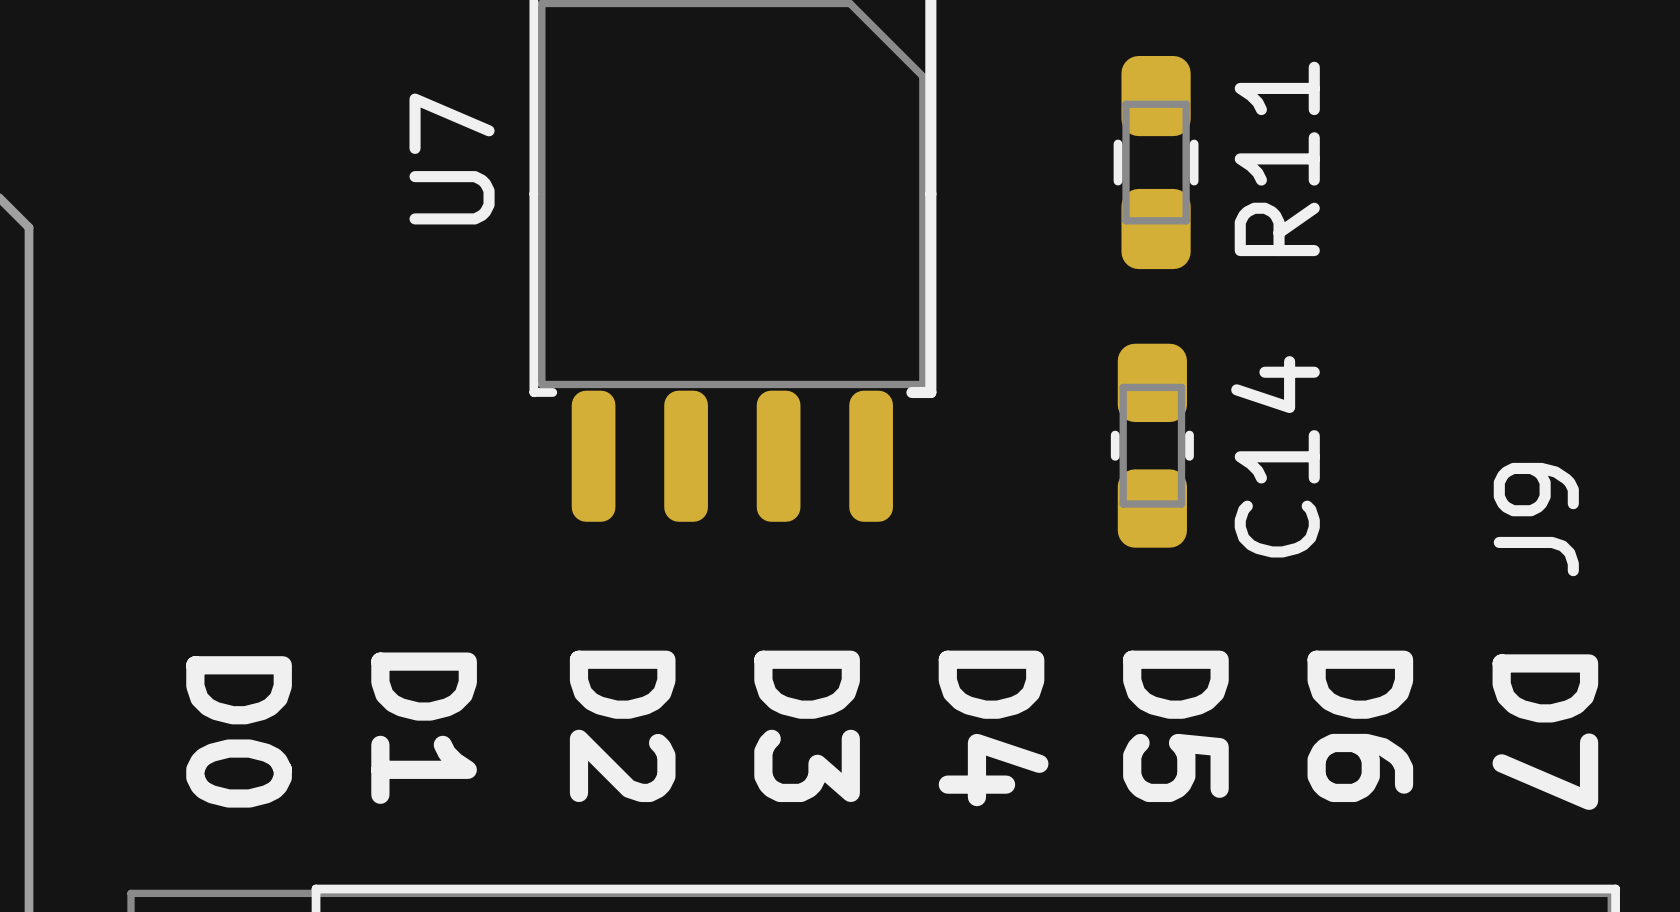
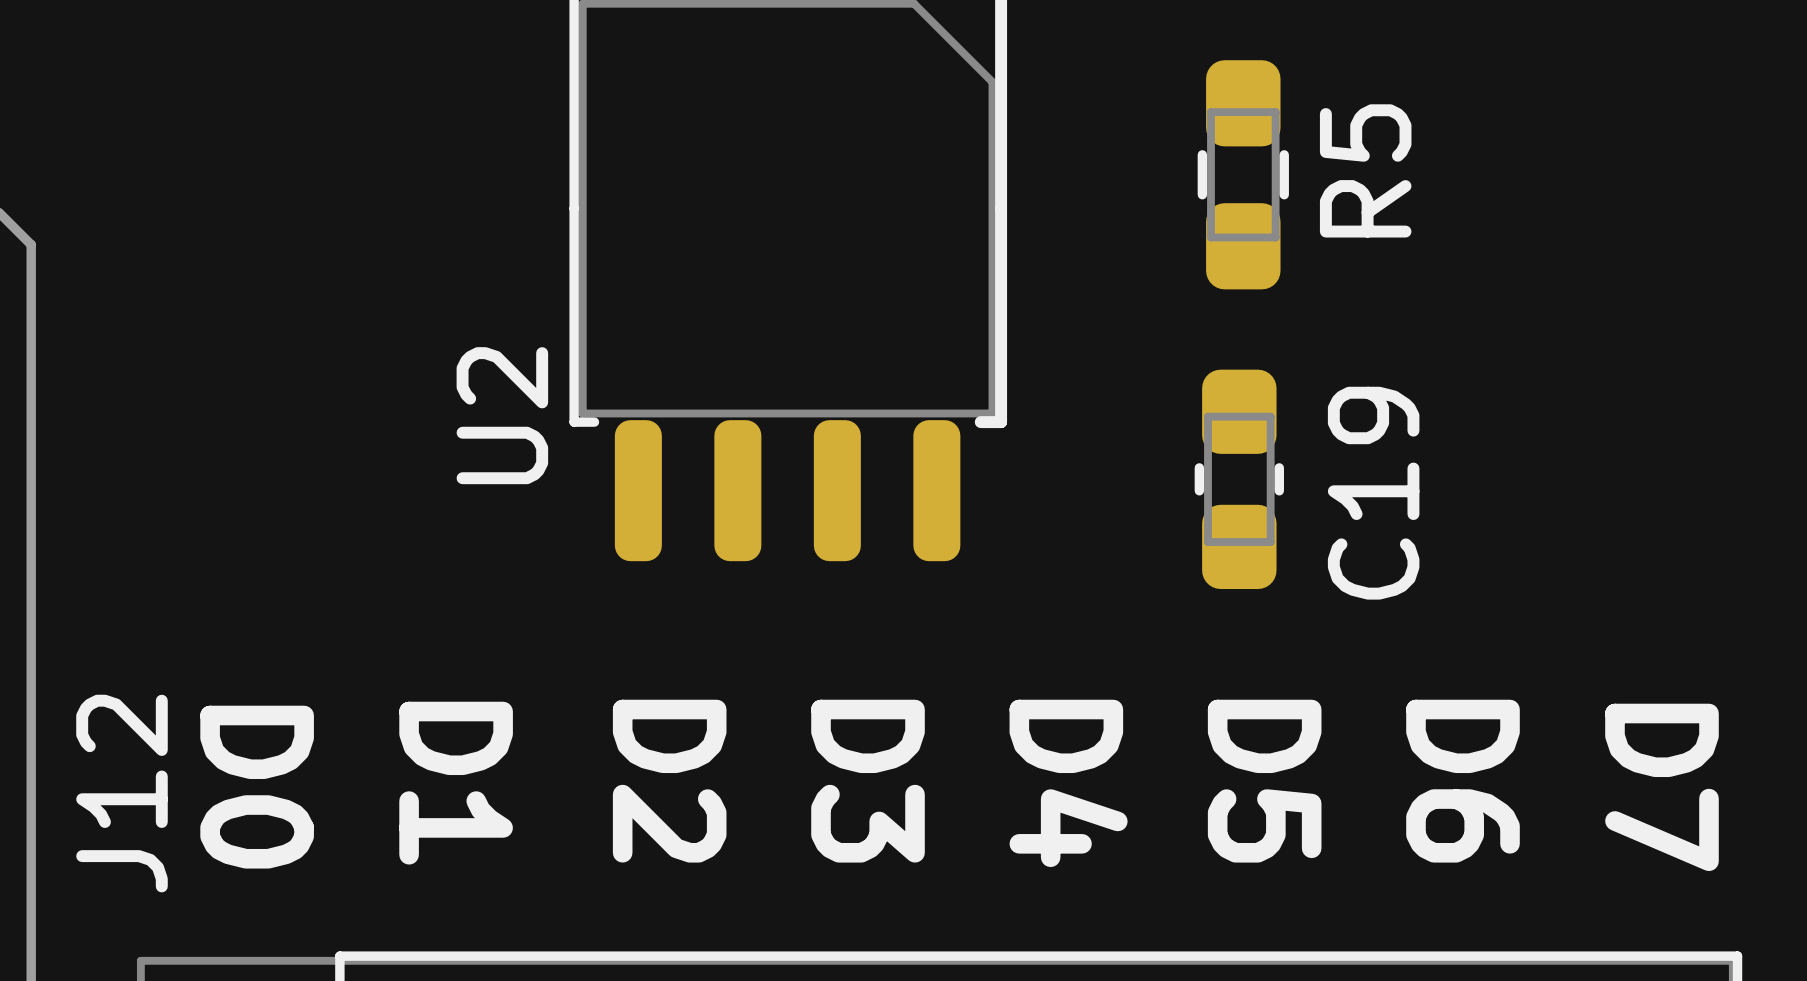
R11 name: R11 (1277, 158) -> R5 (1365, 170)
U7 name: U7 (452, 159) -> U2 (502, 415)
C14 name: C14 (1275, 456) -> C19 (1373, 493)
J9 name: J9 (1536, 519) -> J12 (121, 793)

